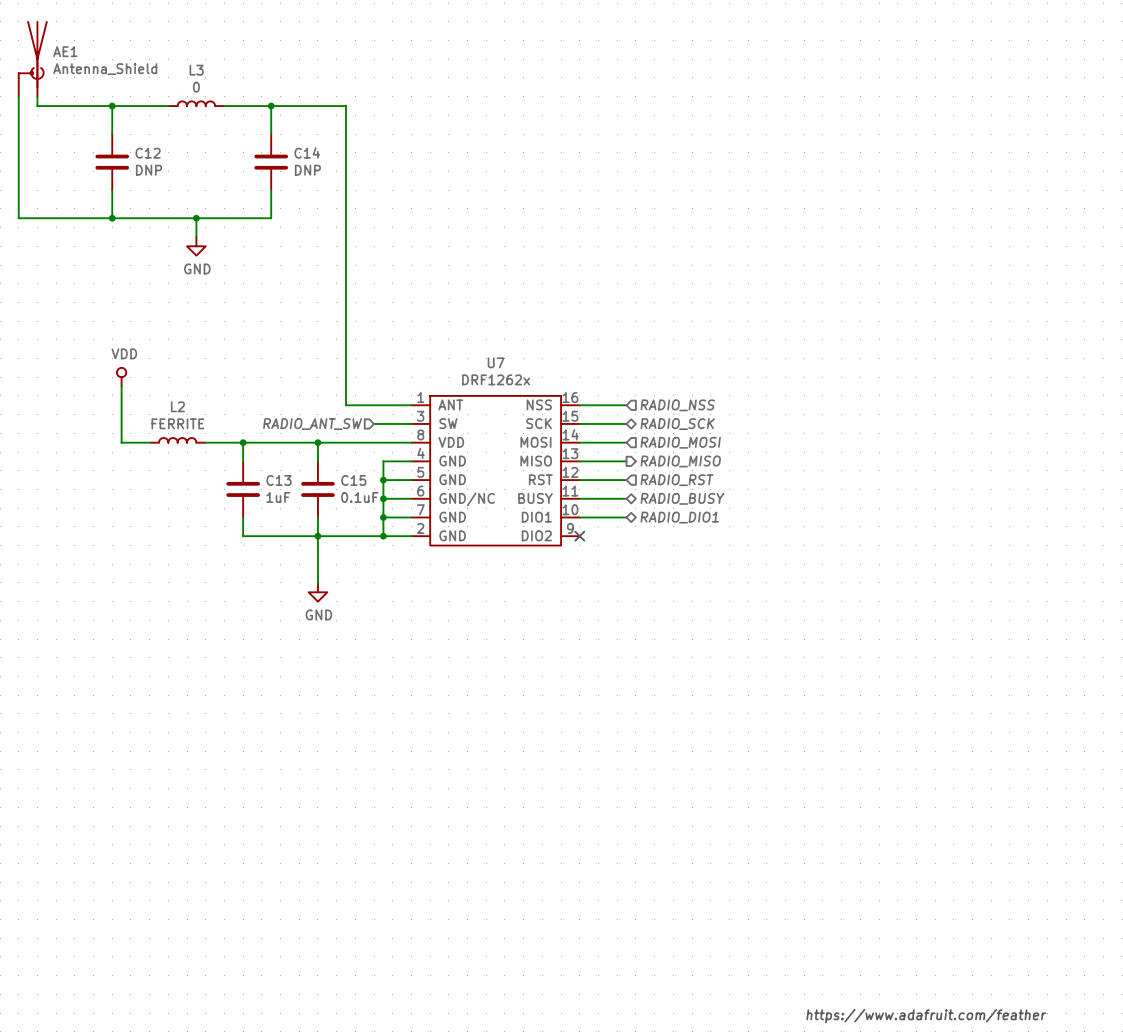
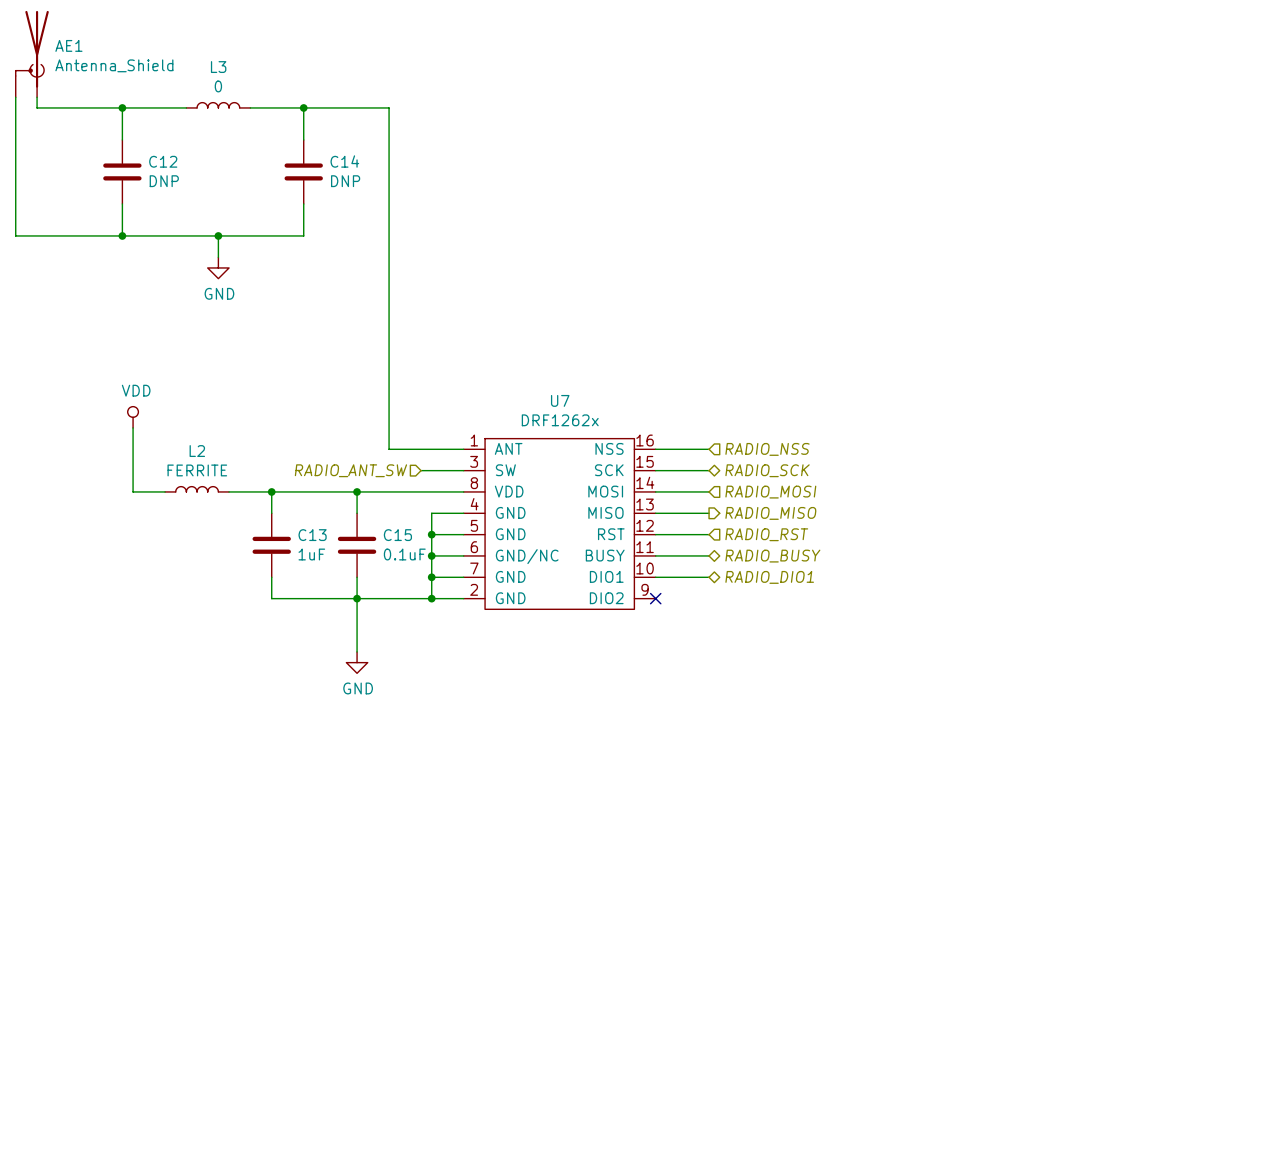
text: https://www.adafruit.com/feather (926, 1016) -> none

